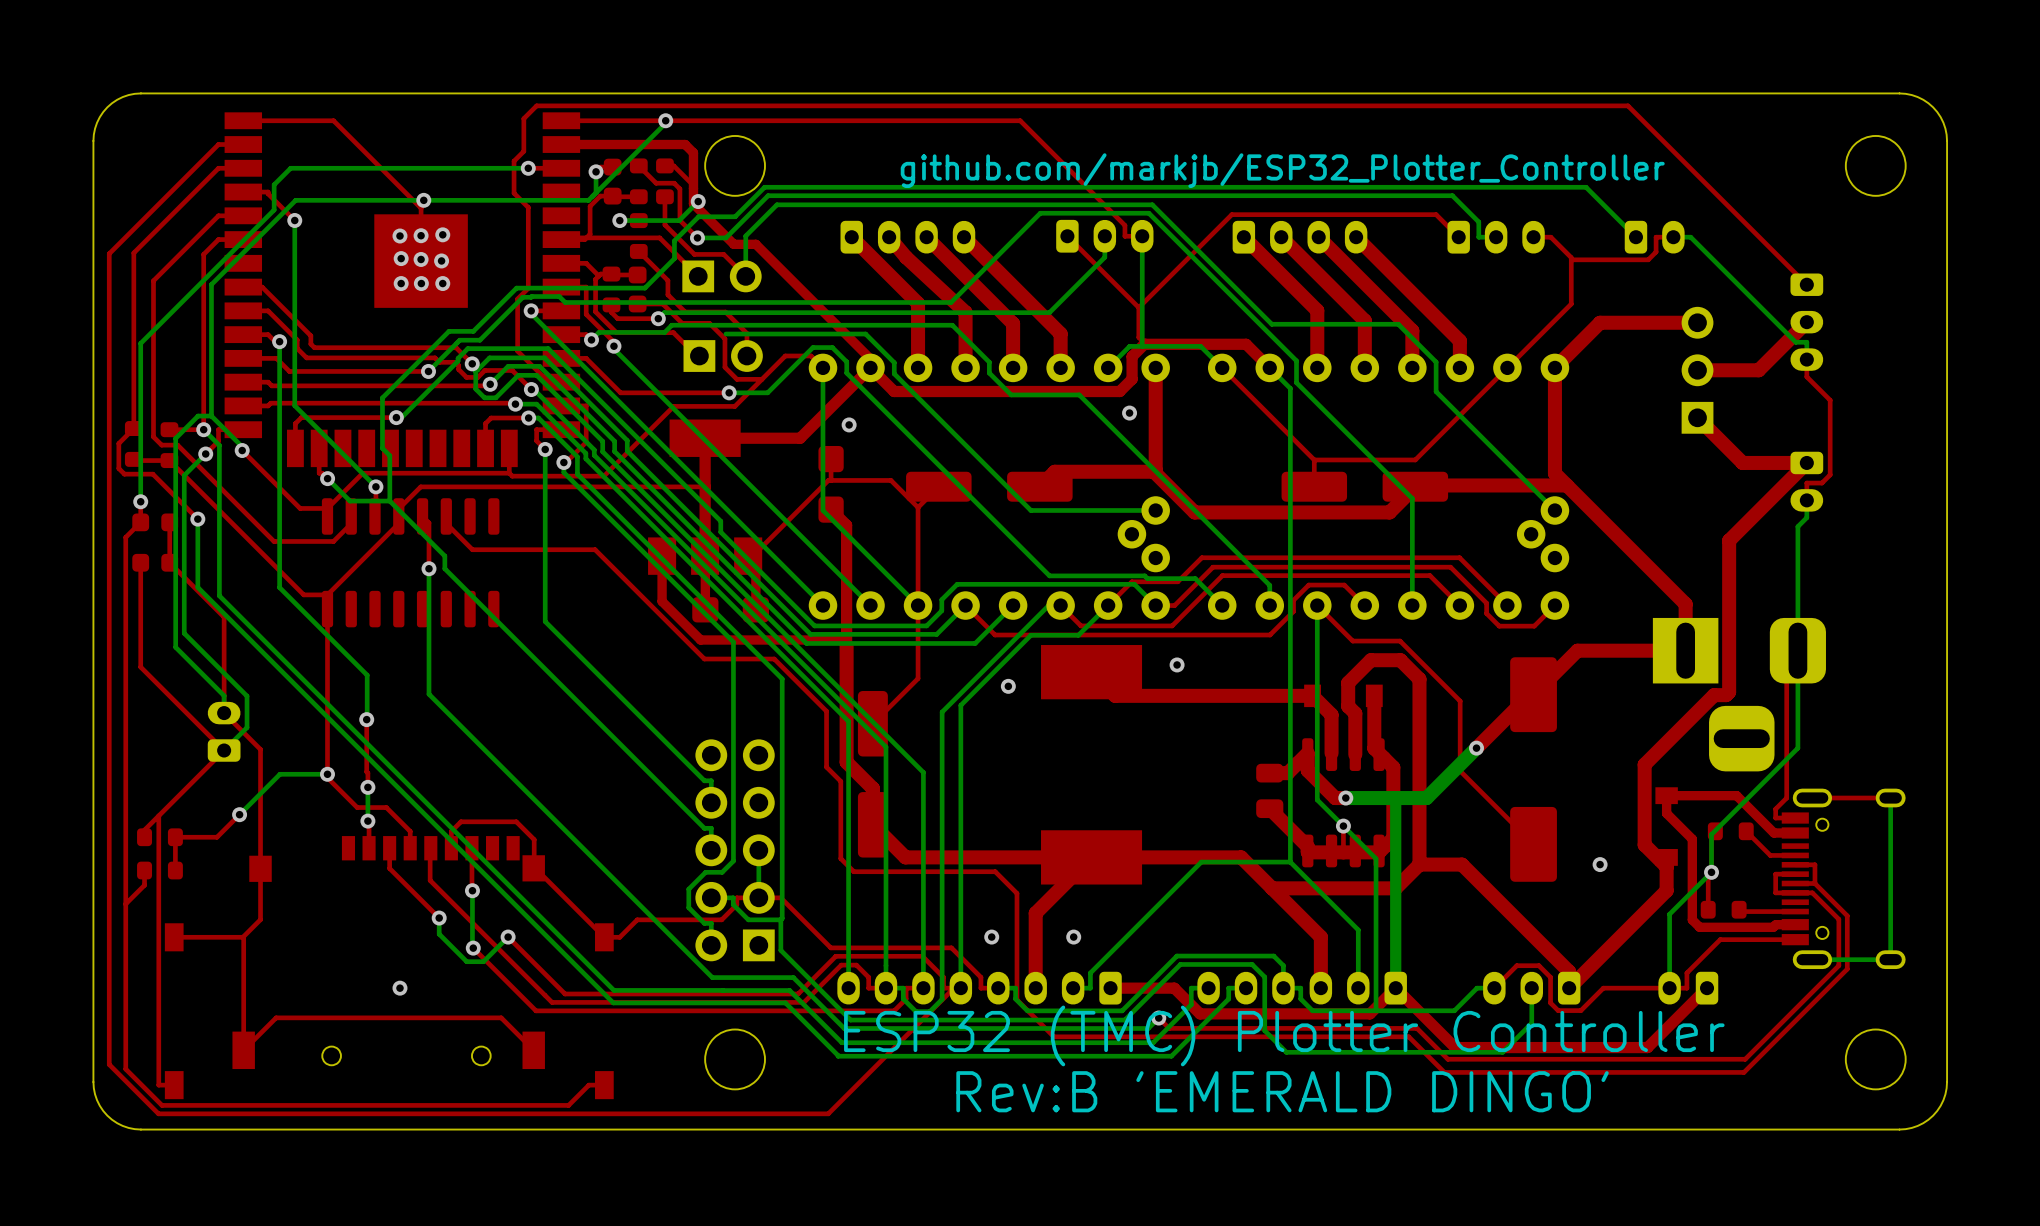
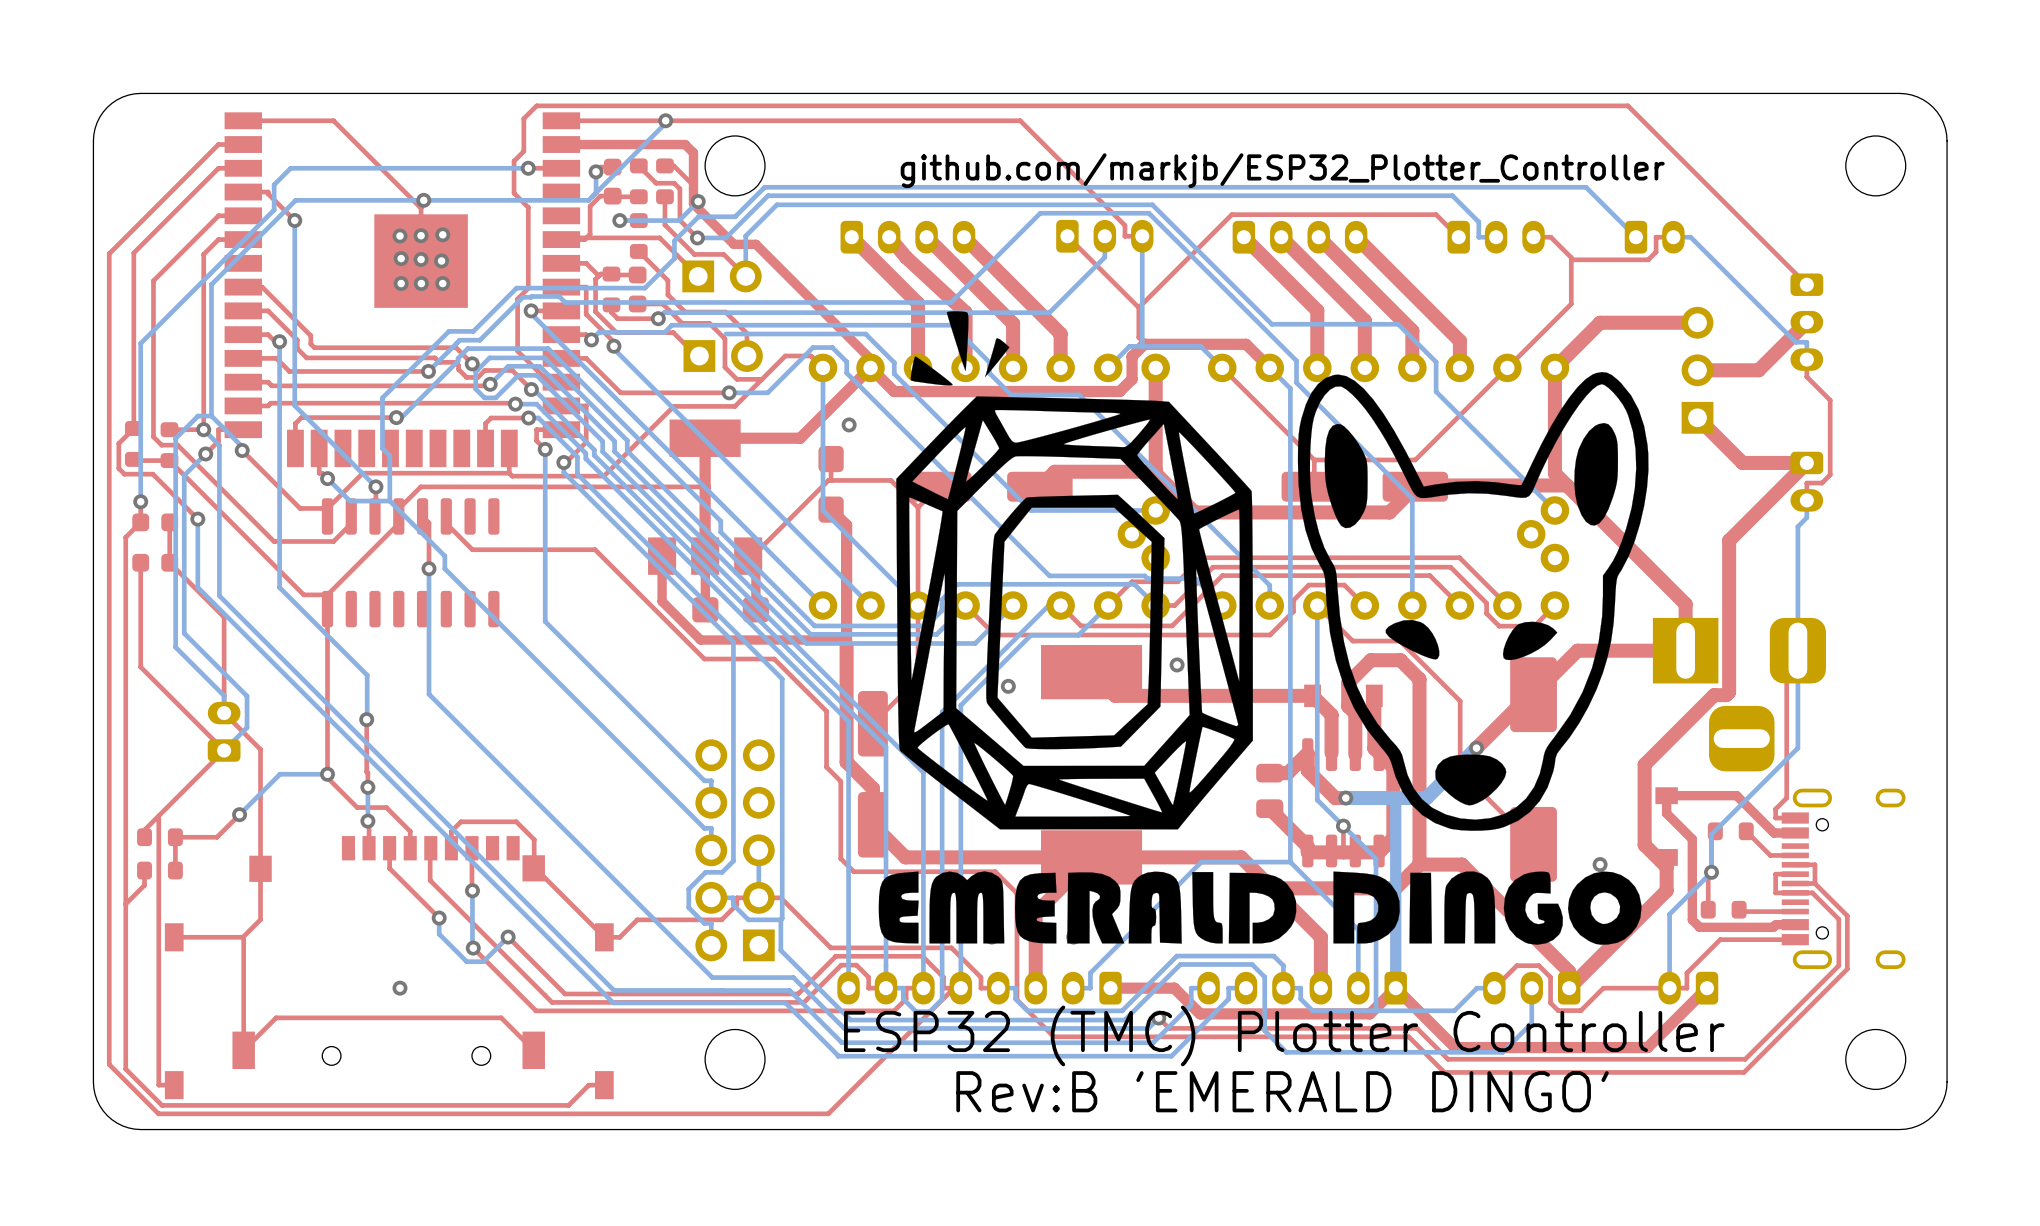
drawing: none -> [878, 311, 1649, 945]
bottom track: (1890, 798) (1890, 959) (1812, 959) -> none
top track: (1890, 798) (1812, 798) -> none

